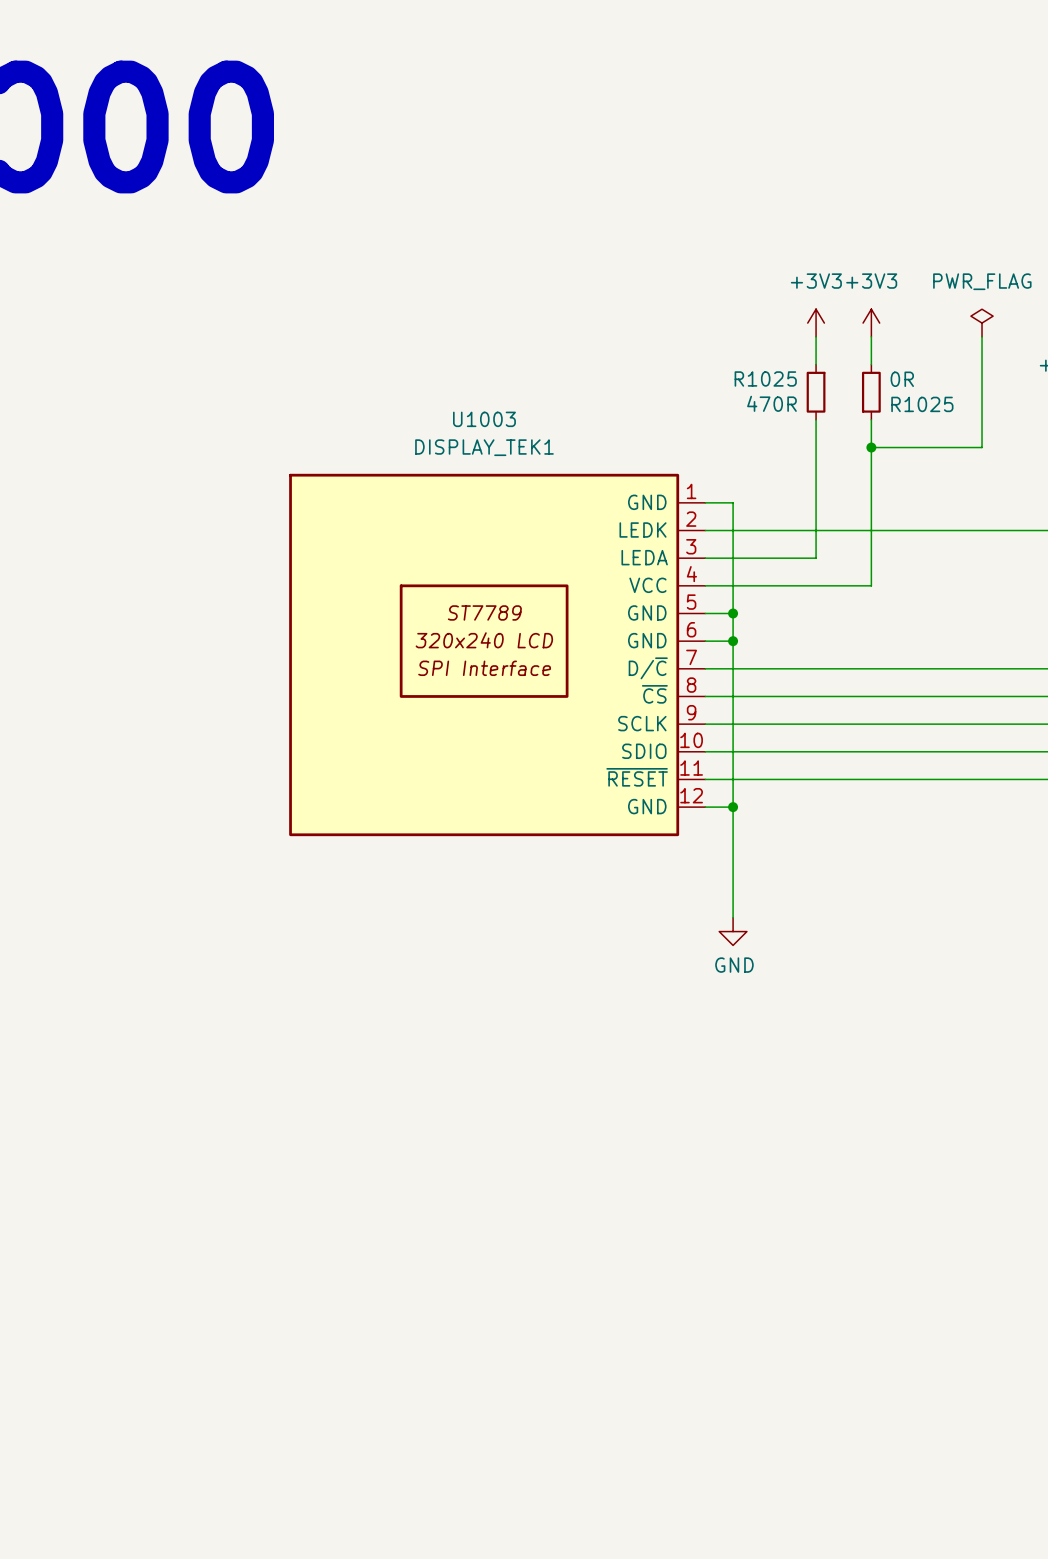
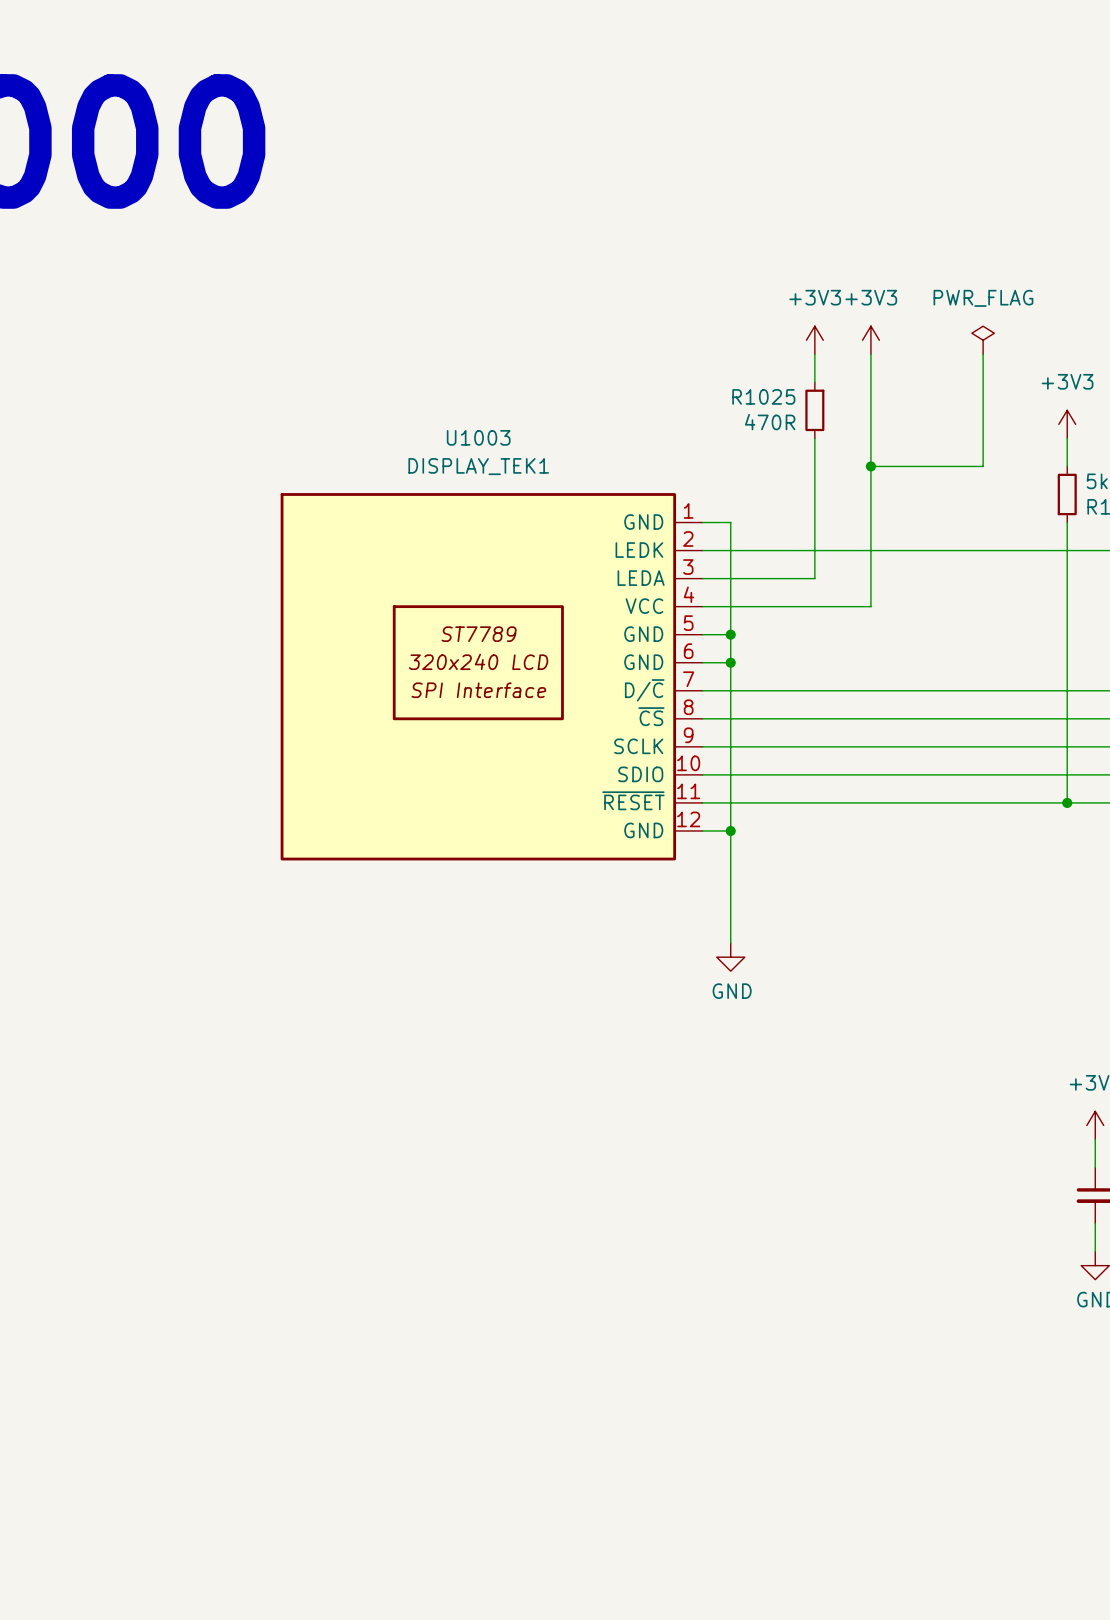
wire: none -> (870, 382) (870, 438)
R1025: 0R (871, 392) -> none

